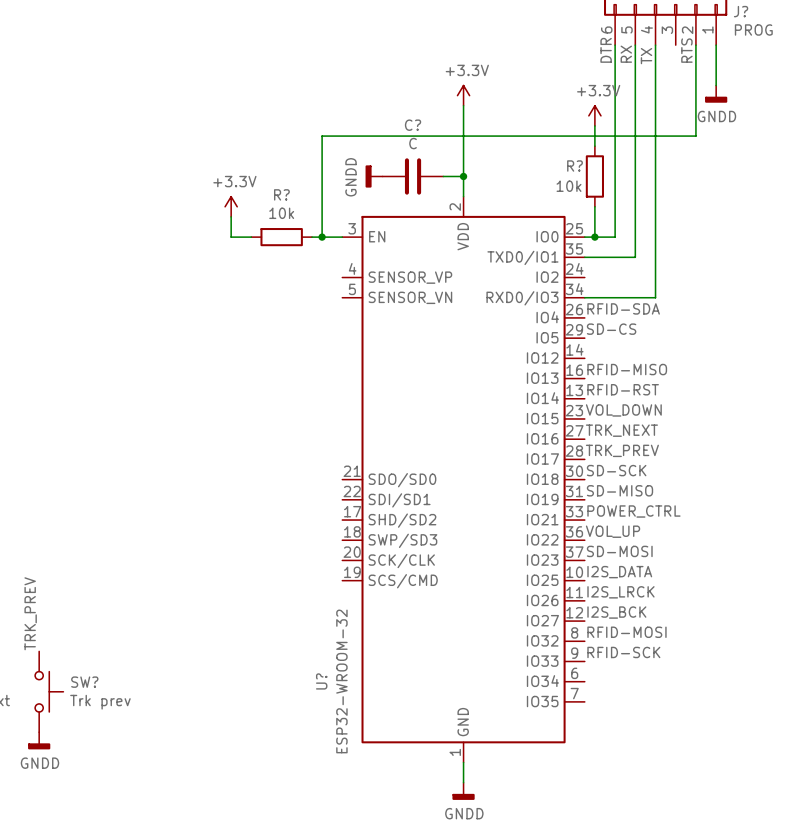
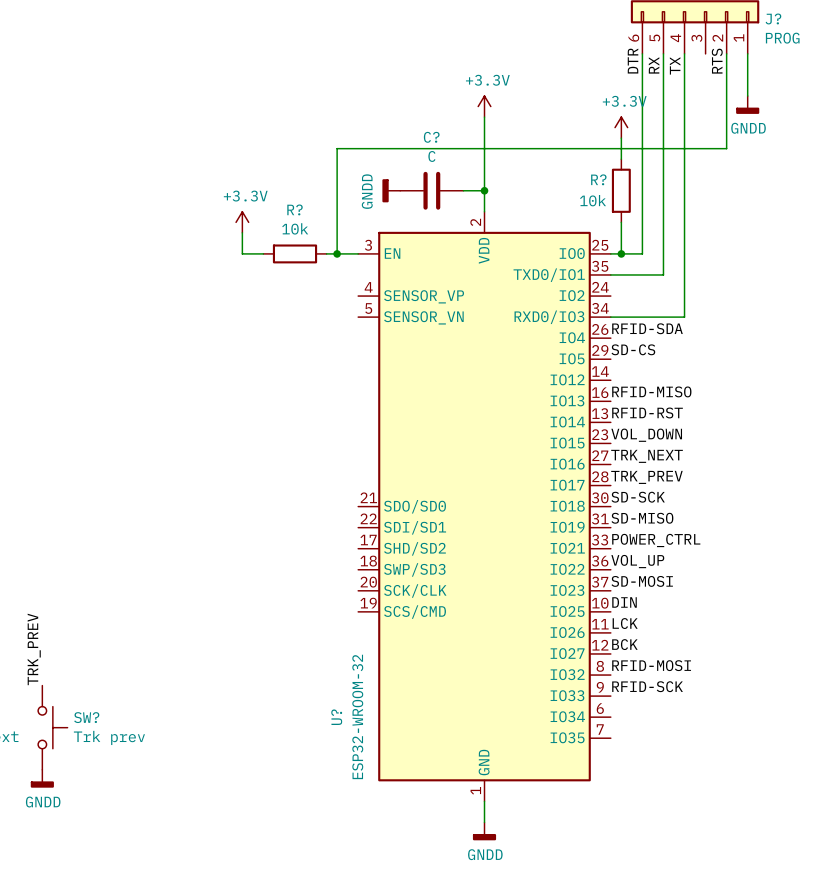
label: I2S_DATA (619, 572) -> DIN (624, 602)
label: I2S_LRCK (620, 592) -> LCK (625, 623)
label: I2S_BCK (616, 612) -> BCK (624, 644)

